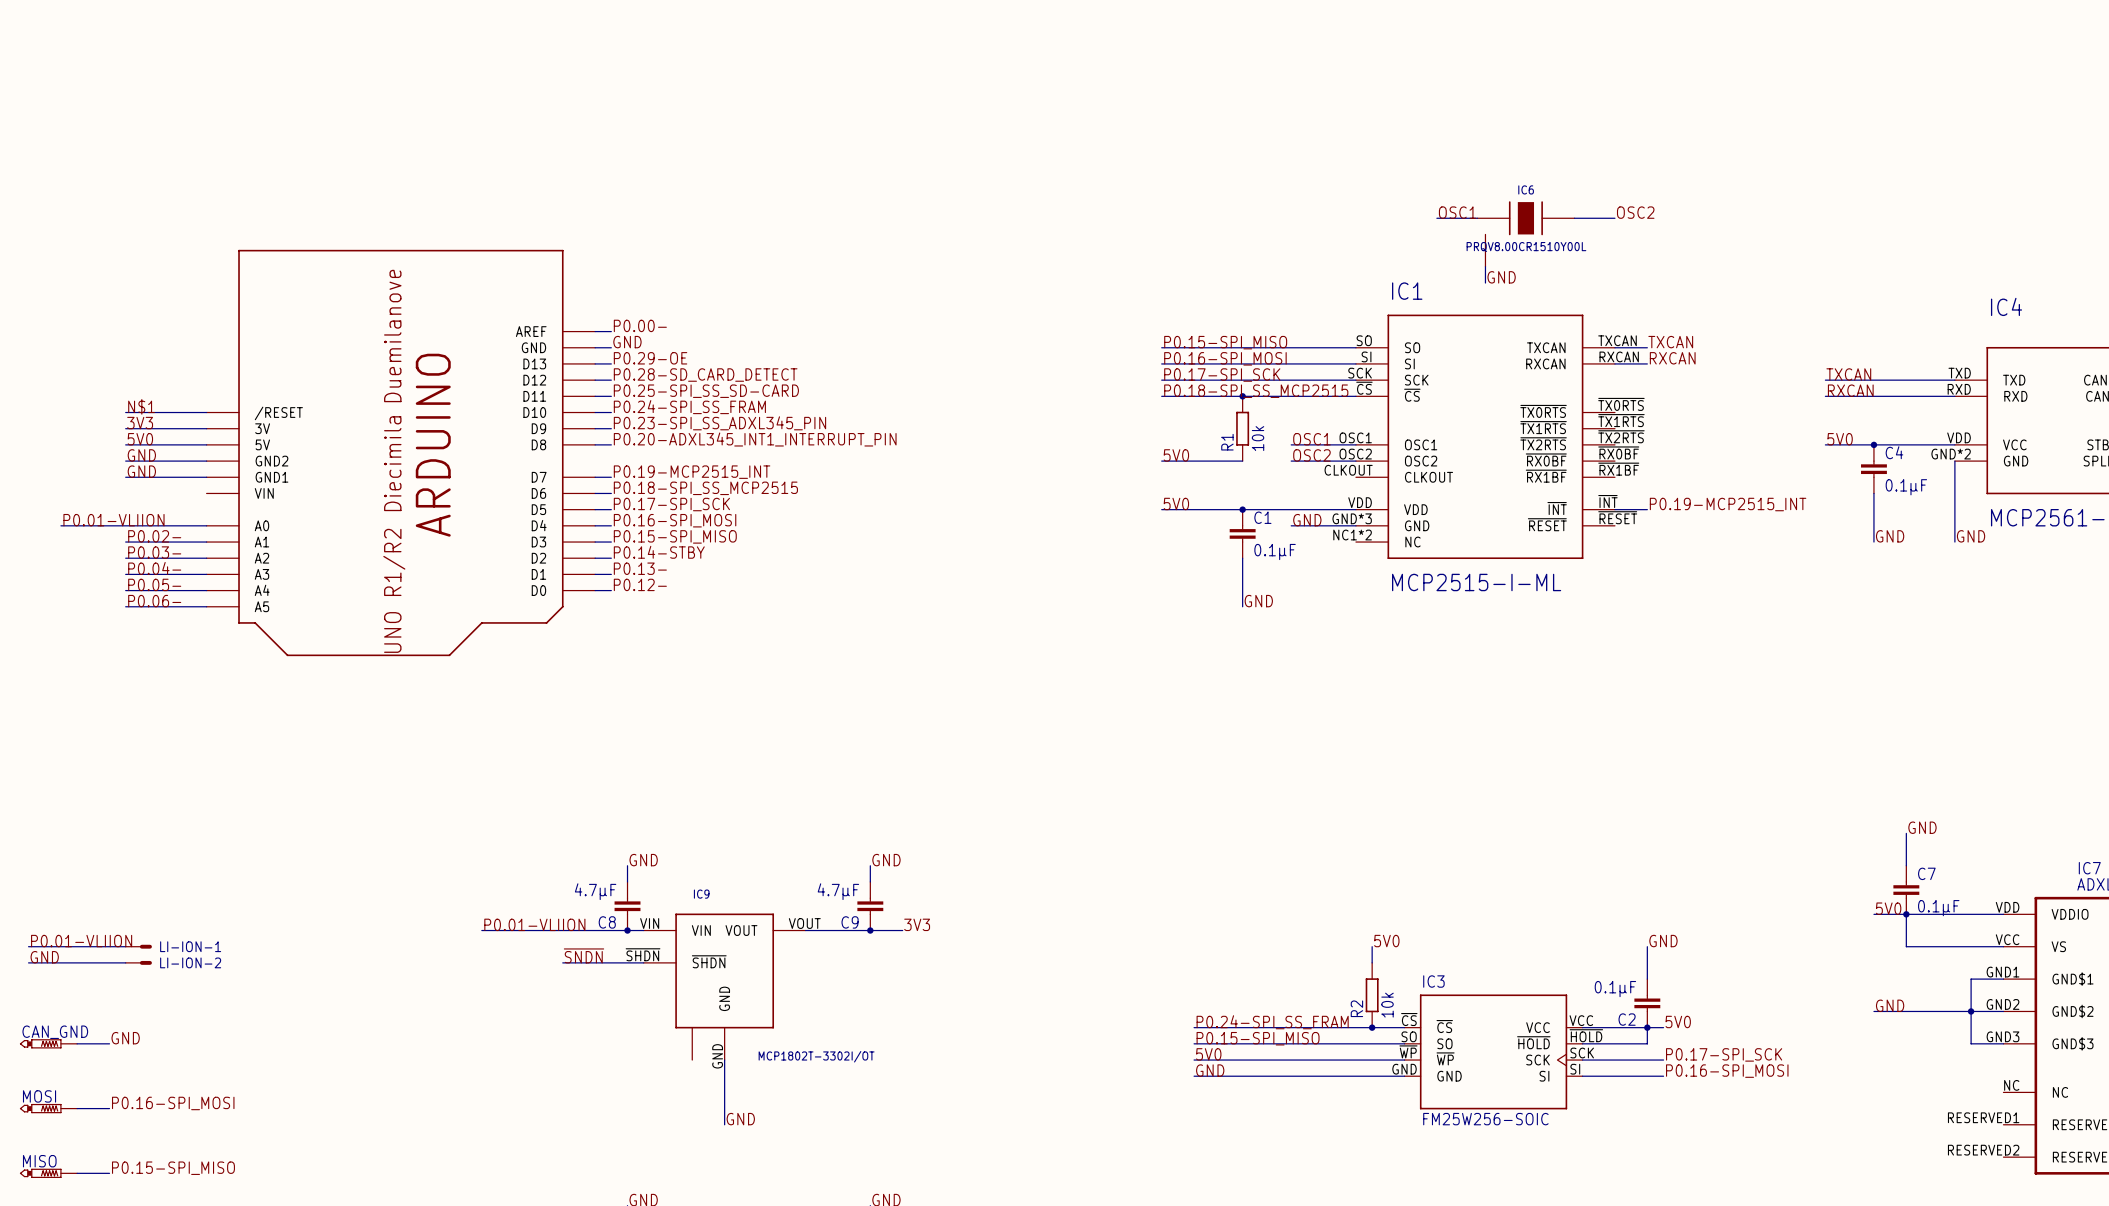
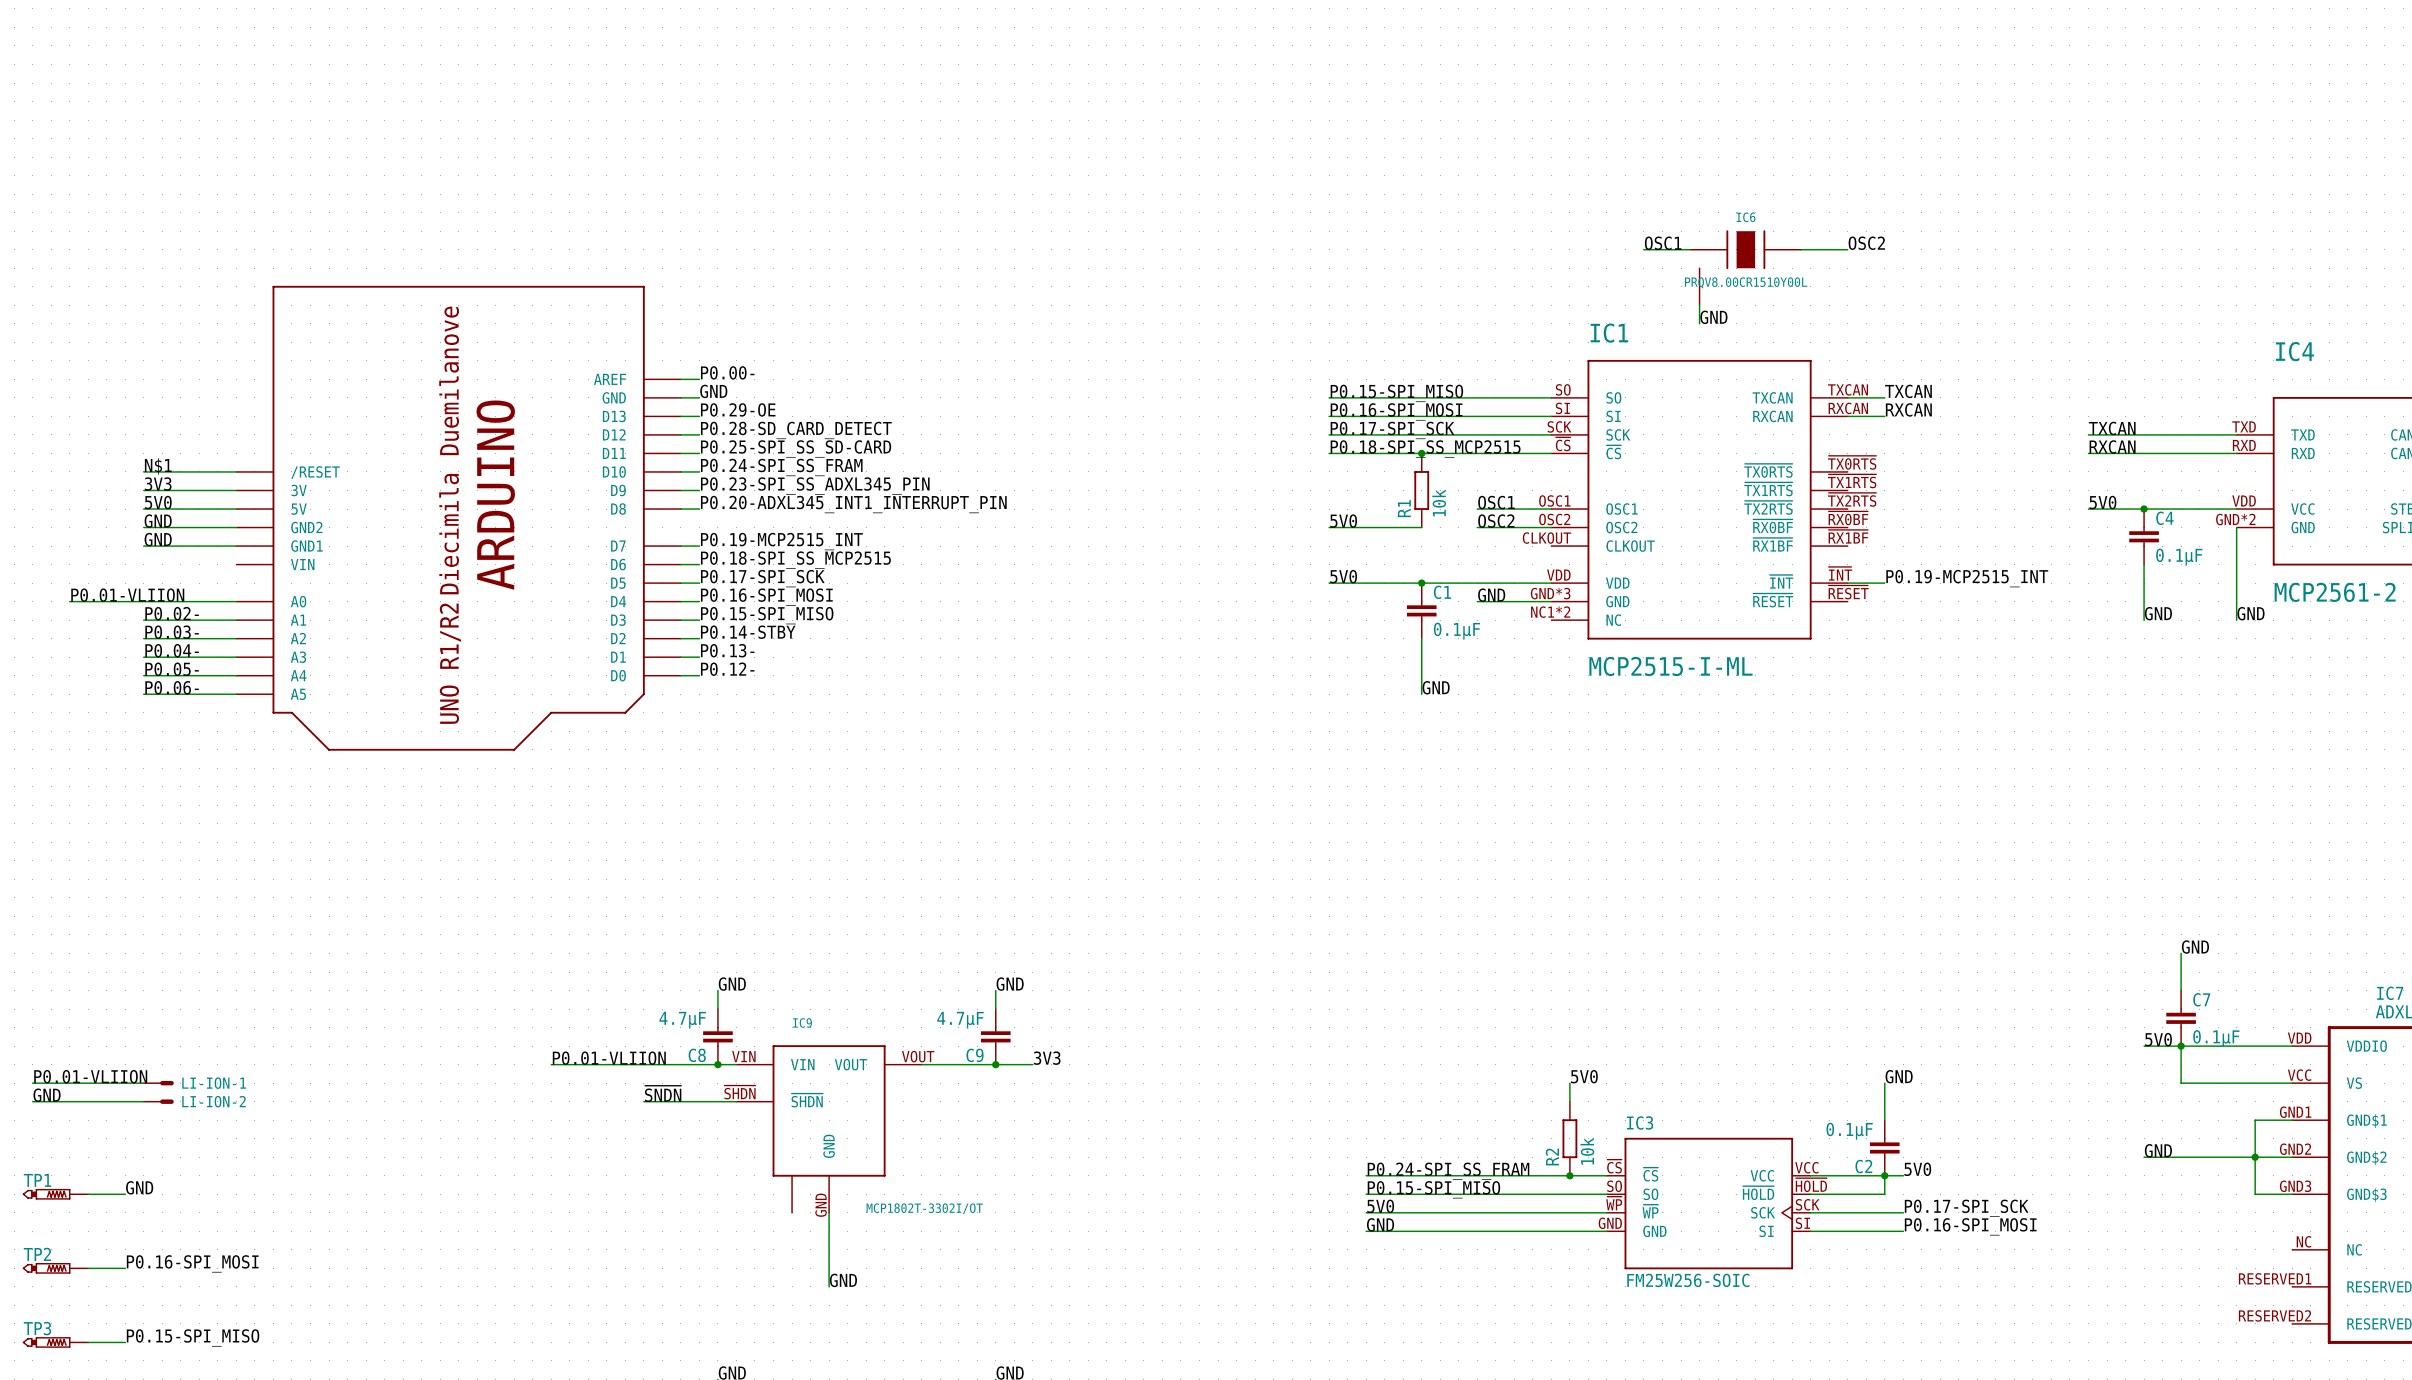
CAN_GND name: CAN_GND (55, 1032) -> TP1 (37, 1180)
MOSI name: MOSI (39, 1096) -> TP2 (37, 1254)
MISO name: MISO (39, 1161) -> TP3 (37, 1328)

